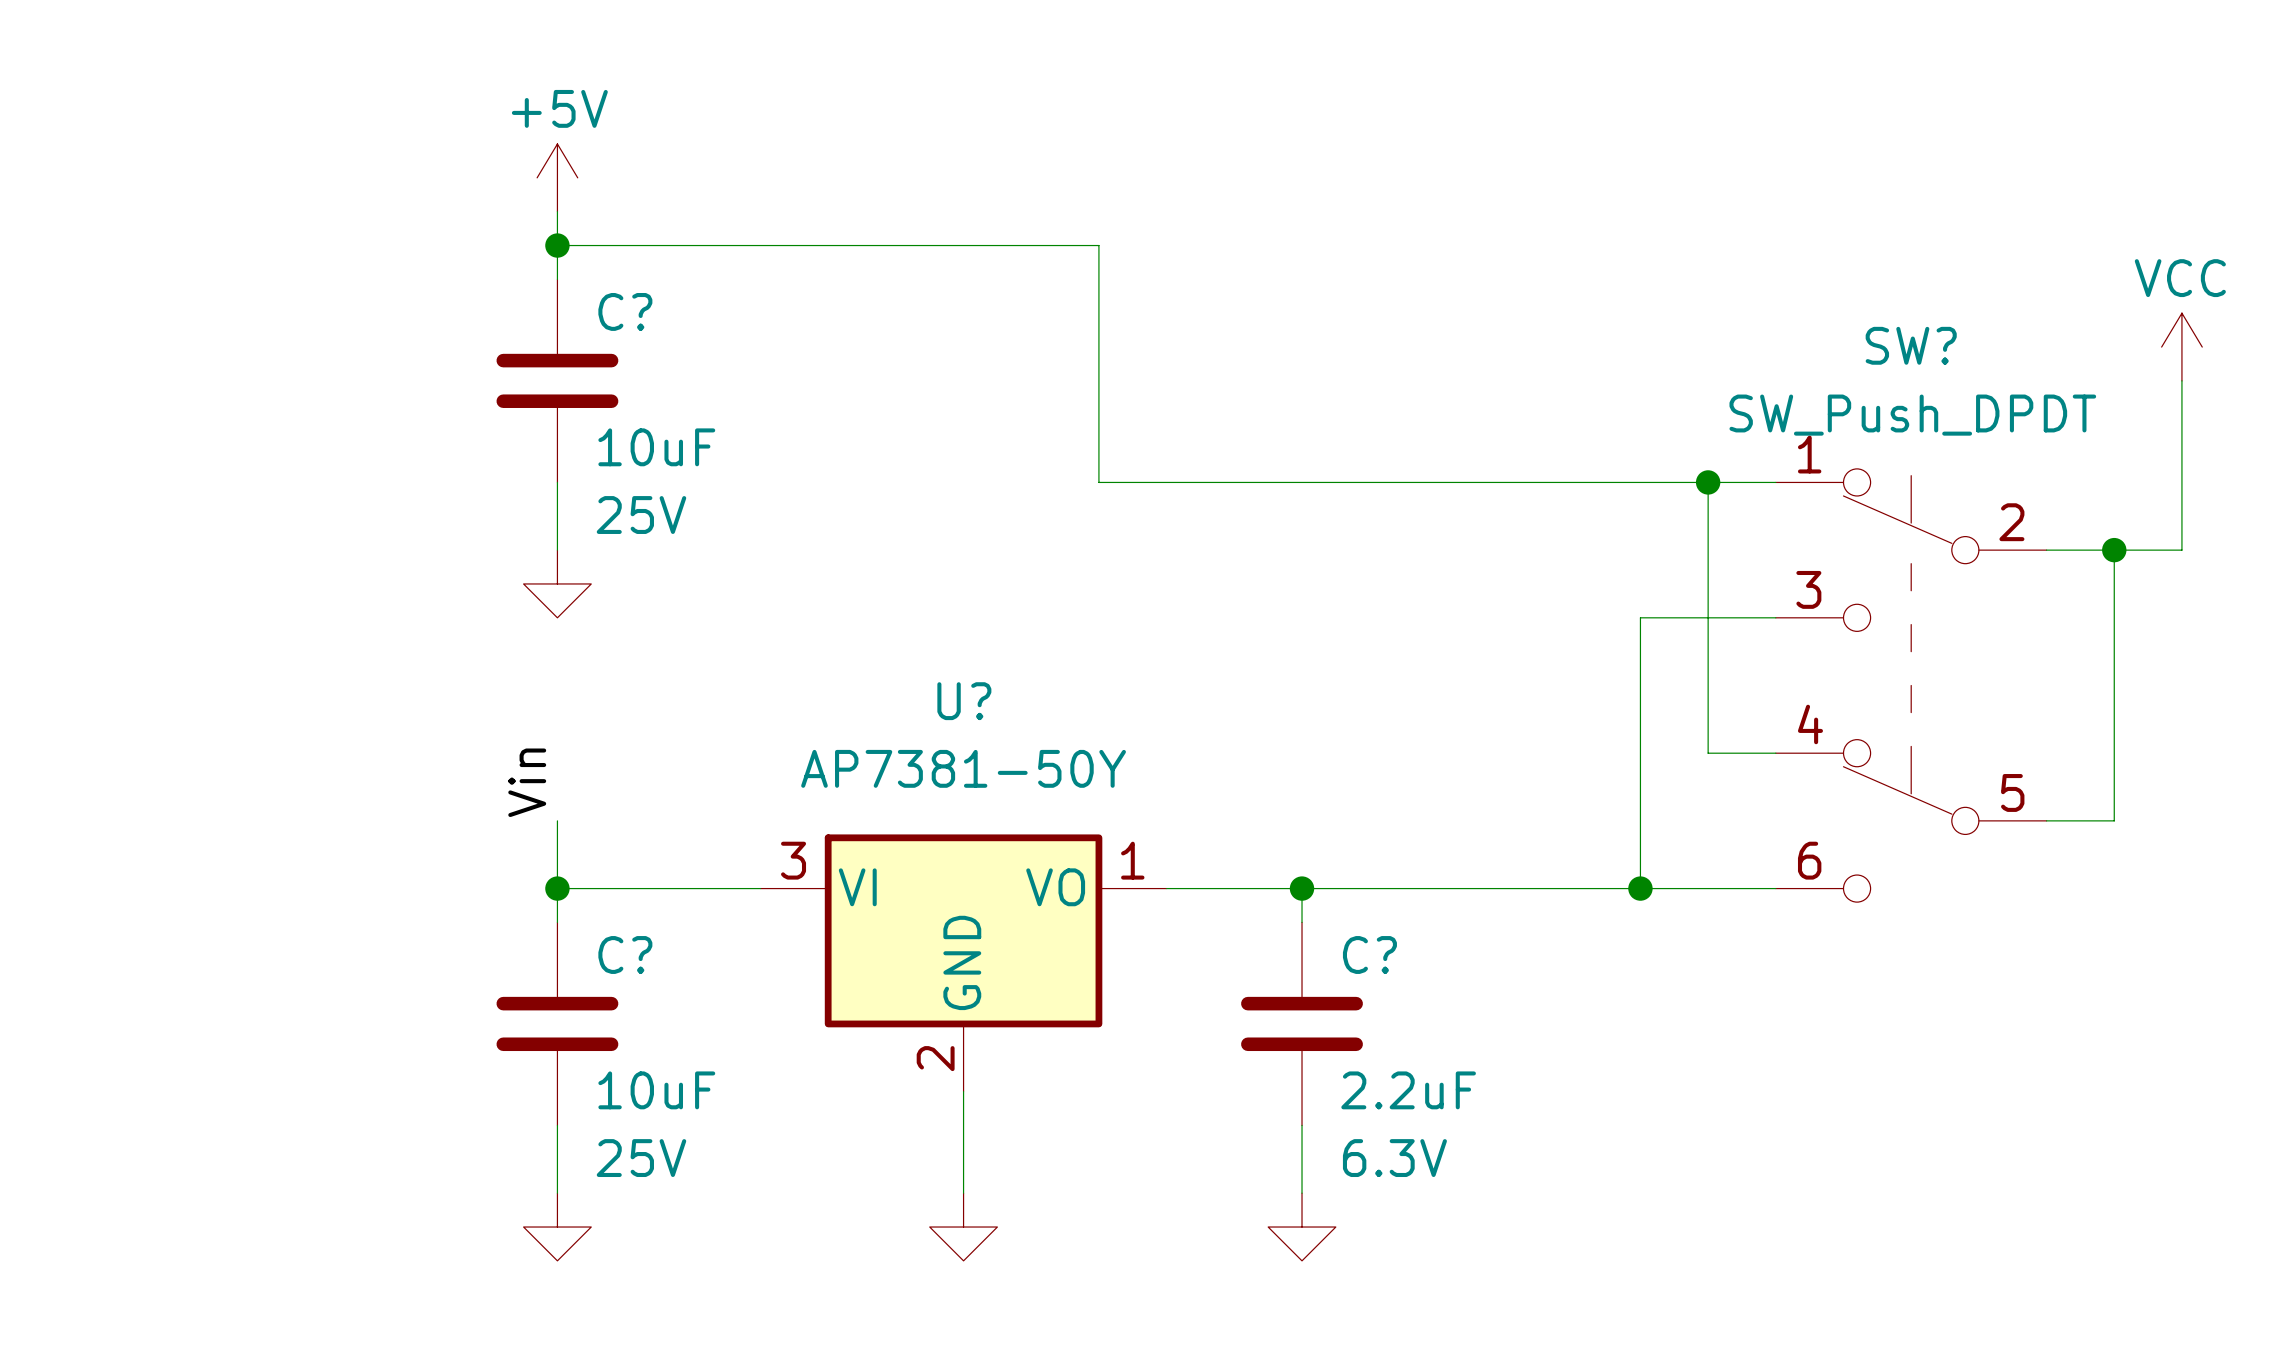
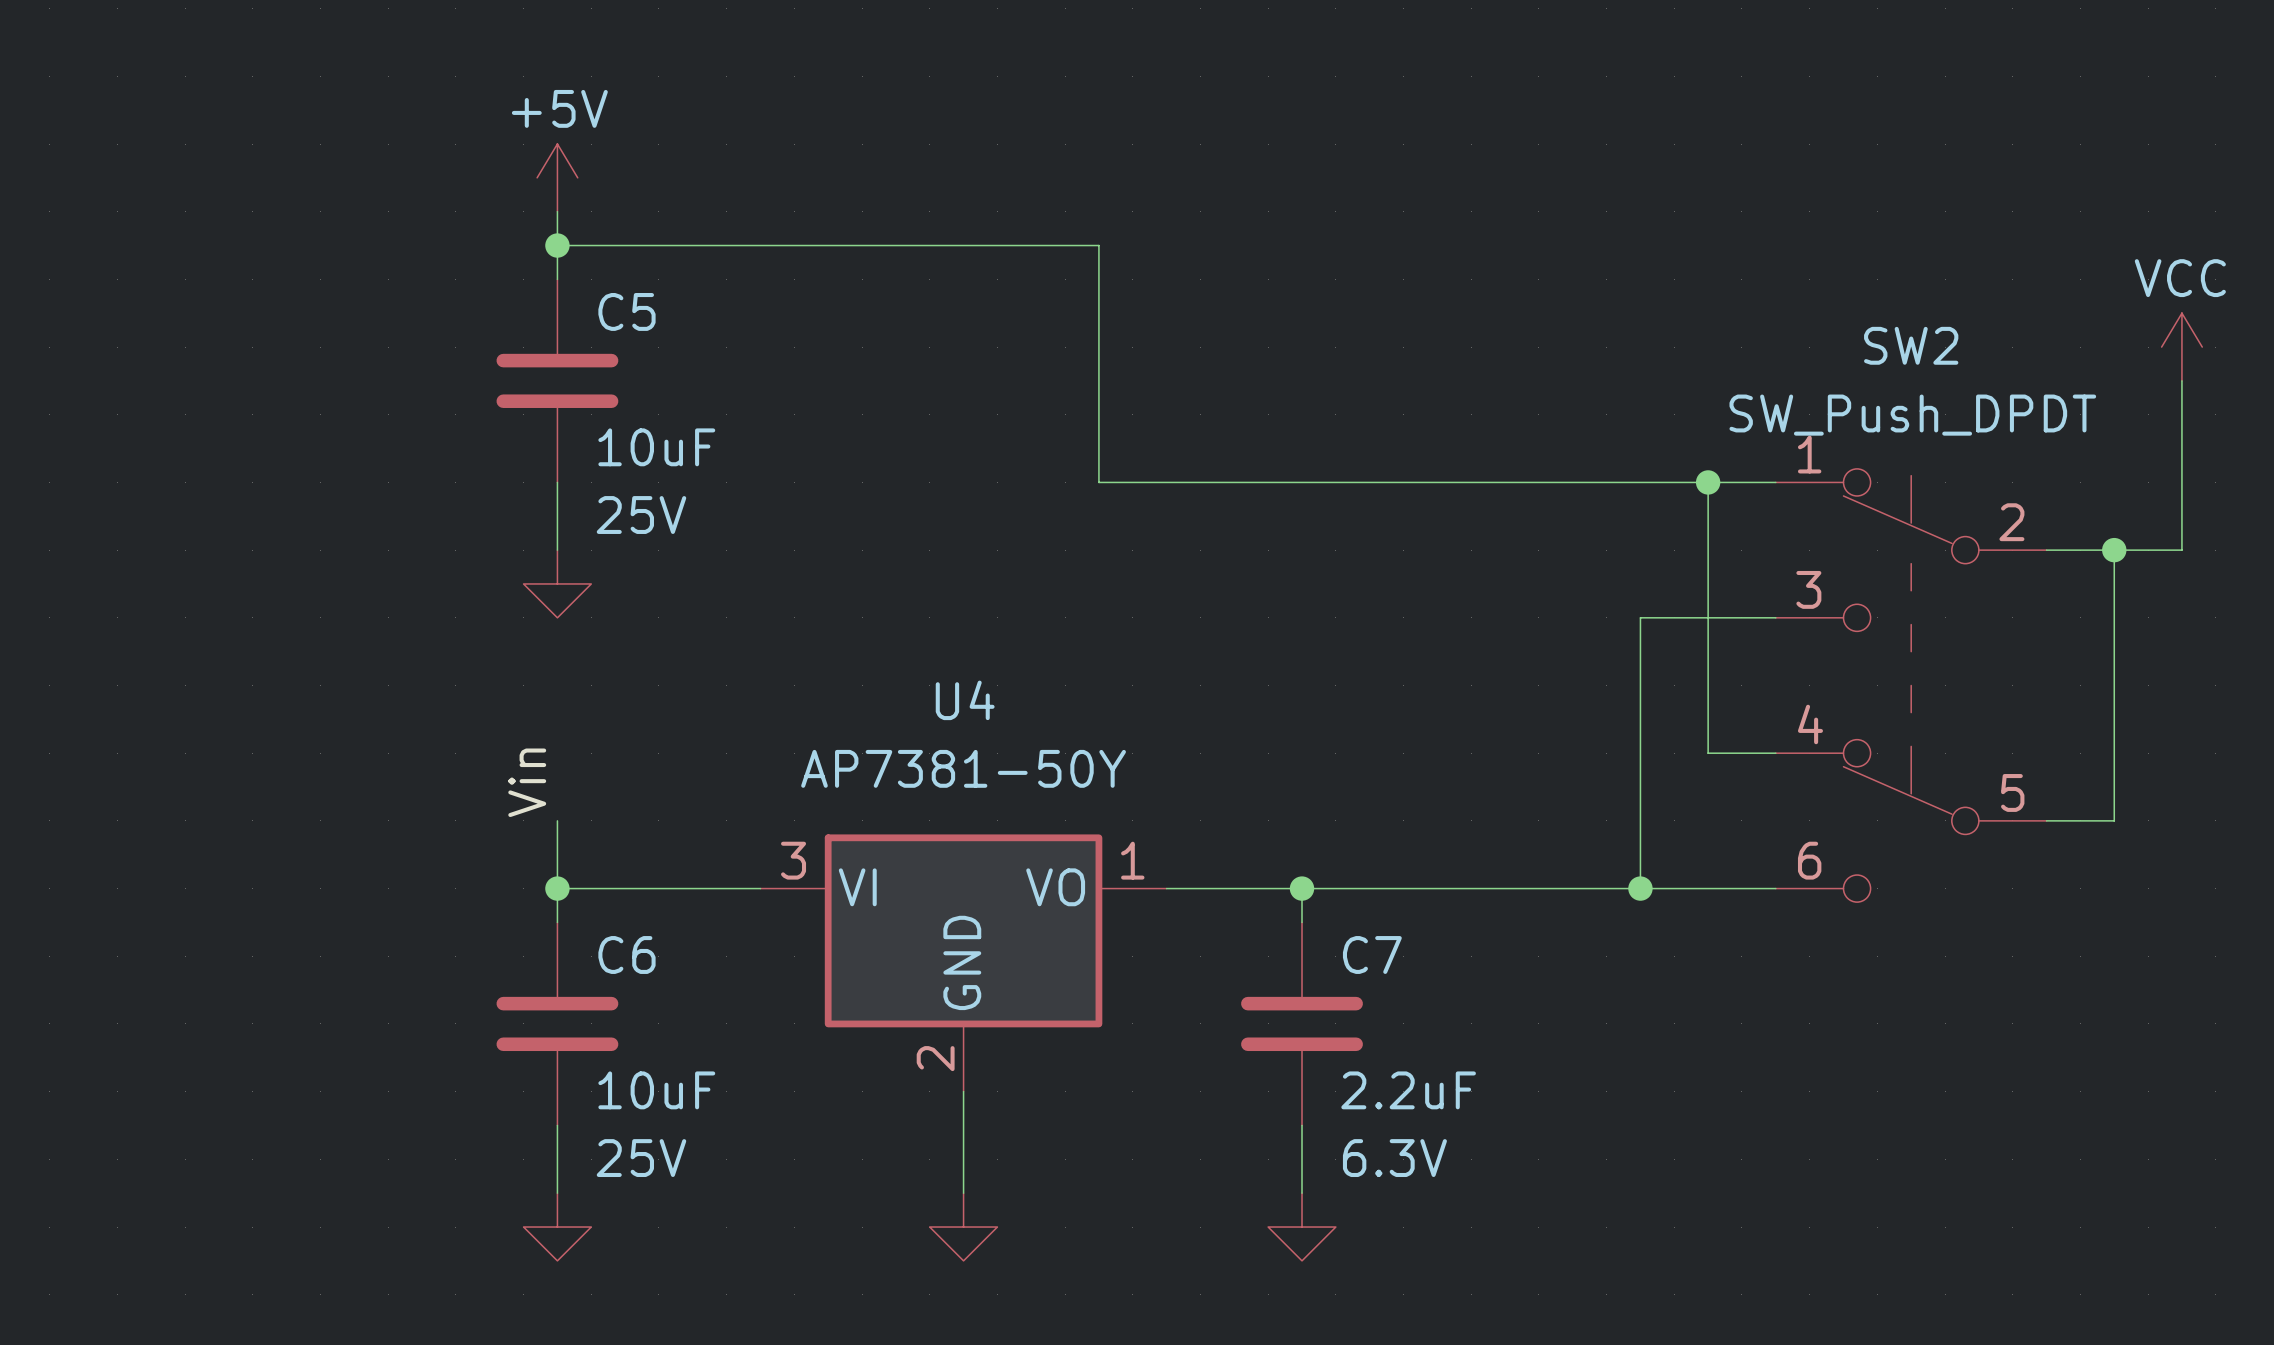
C? name: C? (625, 311) -> C5 (626, 311)
SW? name: SW? (1911, 345) -> SW2 (1911, 345)
U? name: U? (964, 701) -> U4 (965, 700)
C? name: C? (625, 954) -> C6 (626, 954)
C? name: C? (1369, 954) -> C7 (1372, 954)

